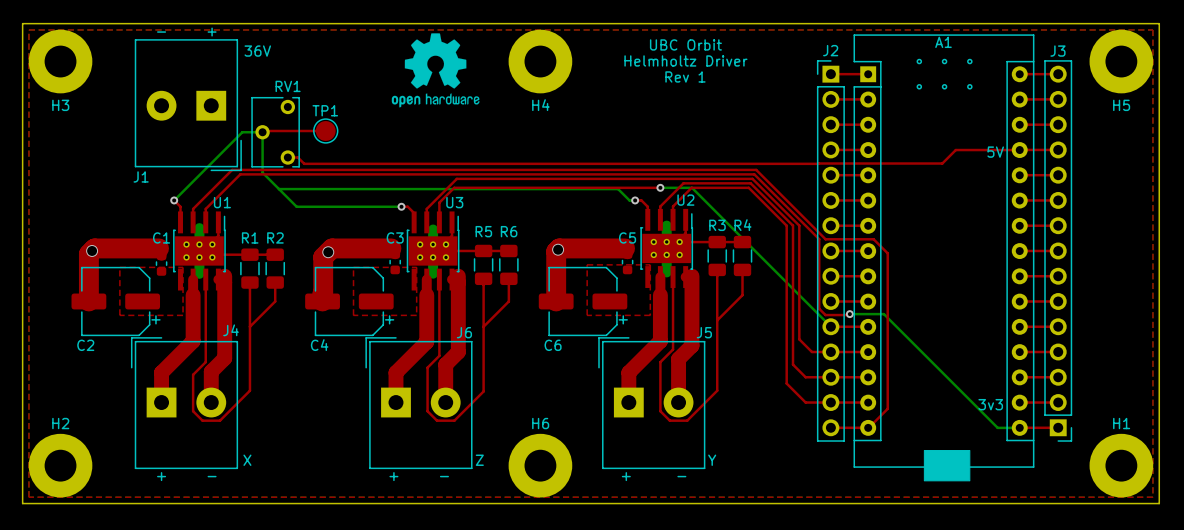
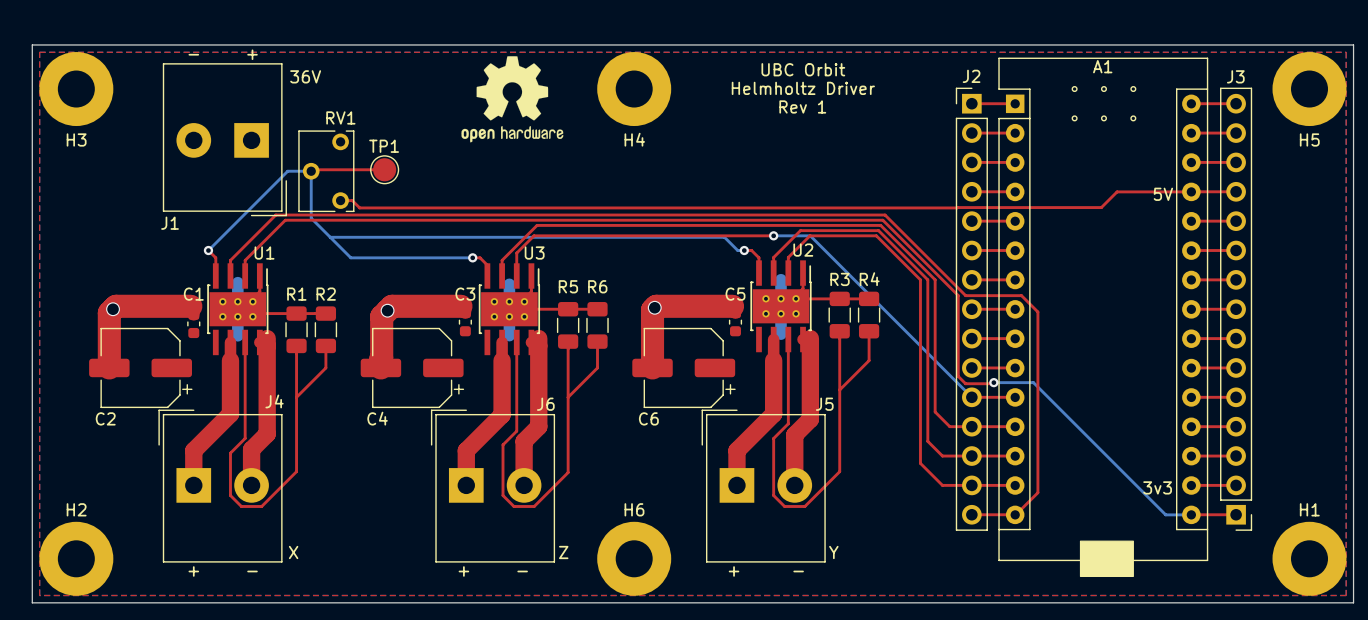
top zone outline: (587, 264) (587, 315) (650, 315) (650, 264) (587, 264) -> none
top zone outline: (119, 267) (119, 315) (183, 315) (183, 267) (119, 267) -> none
top zone outline: (353, 267) (416, 267) (416, 315) (353, 315) (353, 267) -> none

